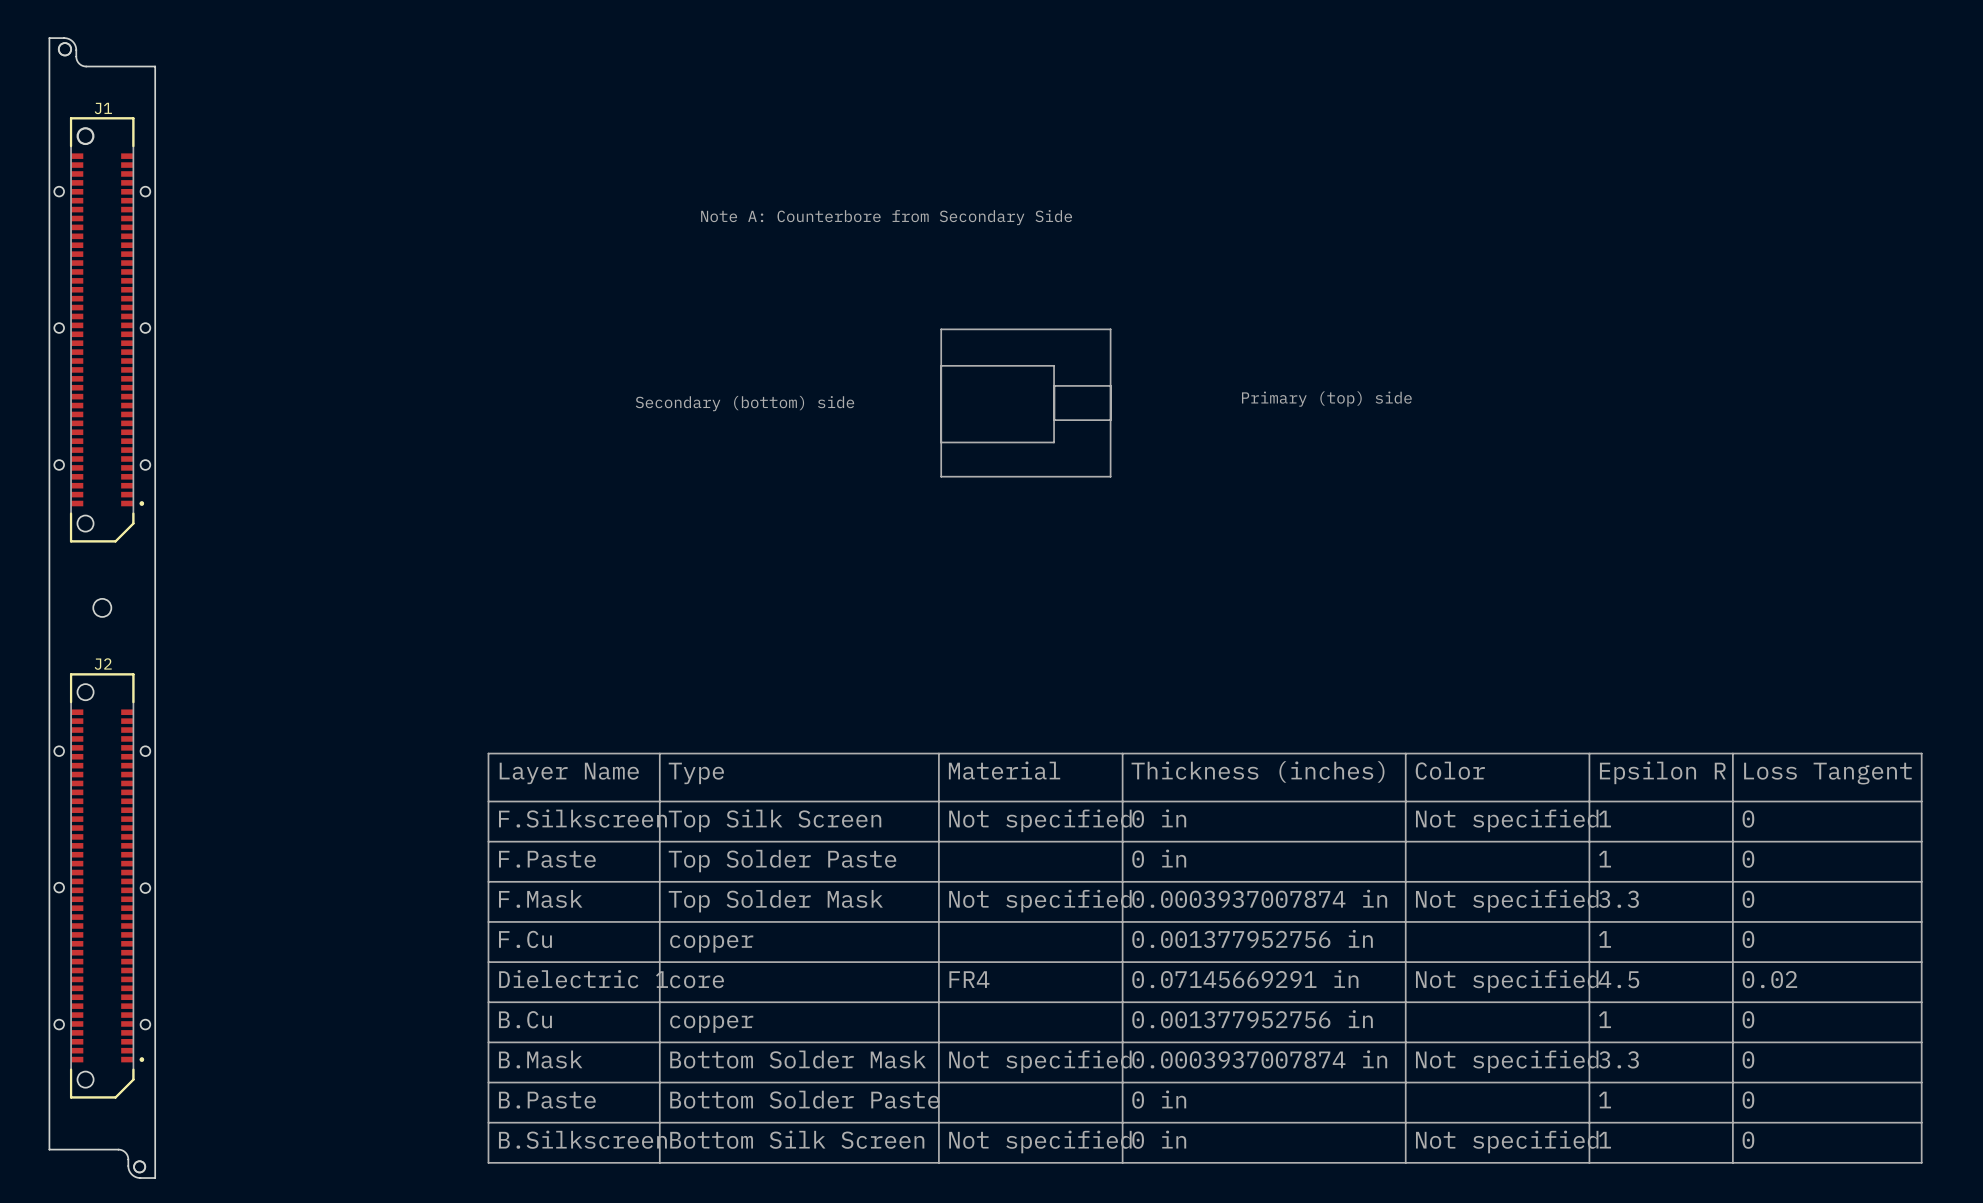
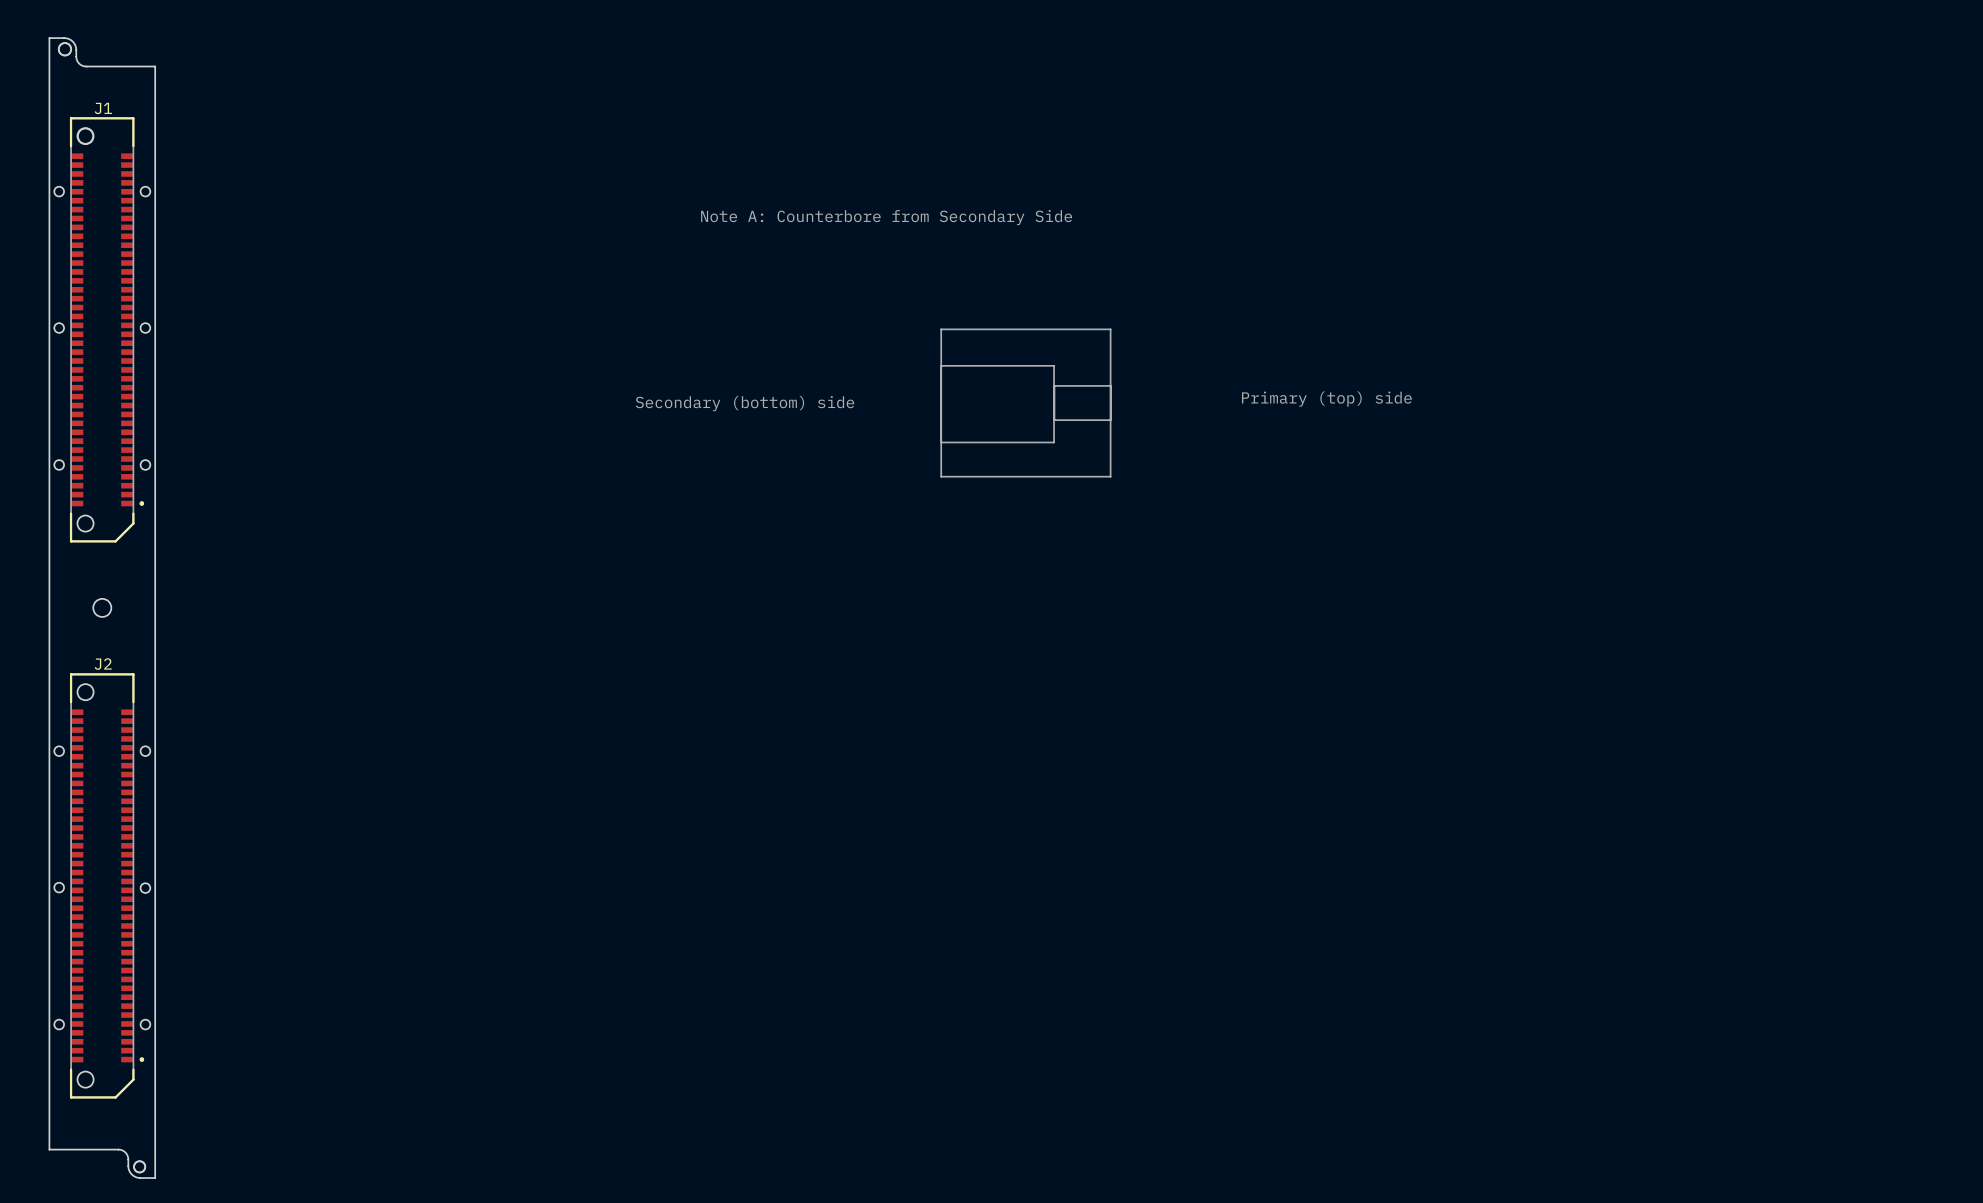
line: (488, 753) (488, 1162) (1921, 1162) (1921, 753) (488, 753) -> none
line: (659, 753) (659, 1162) -> none
line: (938, 753) (938, 1162) -> none
line: (1122, 753) (1122, 1162) -> none
line: (1405, 753) (1405, 1162) -> none
line: (1589, 753) (1589, 1162) -> none
line: (1732, 753) (1732, 1162) -> none
text: Material (1004, 770) -> none
text: Color (1450, 770) -> none
text: Thickness (inches) (1258, 771) -> none
text: Epsilon R (1662, 772) -> none
text: Layer Name (569, 773) -> none
text: Type (696, 773) -> none
text: Loss Tangent (1827, 773) -> none
line: (488, 801) (1921, 801) -> none
text: F.Silkscreen (582, 818) -> none
text: 0 in (1159, 818) -> none
text: 1 (1605, 819) -> none
text: 0 (1748, 819) -> none
text: Top Silk Screen (775, 820) -> none
text: Not specified (1040, 820) -> none
text: Not specified (1507, 820) -> none
line: (488, 841) (1921, 841) -> none
text: 0 in (1159, 858) -> none
text: F.Paste (547, 859) -> none
text: 1 (1605, 859) -> none
text: 0 (1748, 859) -> none
text: Top Solder Paste (782, 861) -> none
line: (488, 881) (1921, 881) -> none
text: F.Mask (540, 898) -> none
text: 0.0003937007874 in (1259, 898) -> none
text: 3.3 (1618, 899) -> none
text: 0 (1748, 899) -> none
text: Top Solder Mask (775, 901) -> none
text: Not specified (1040, 901) -> none
text: Not specified (1507, 901) -> none
line: (488, 921) (1921, 921) -> none
text: 0.001377952756 in (1252, 938) -> none
text: F.Cu (525, 939) -> none
text: 1 (1605, 939) -> none
text: 0 (1748, 939) -> none
text: copper (711, 943) -> none
line: (488, 962) (1921, 962) -> none
text: Dielectric 1 (583, 979) -> none
text: FR4 (969, 979) -> none
text: 0.07145669291 in (1245, 979) -> none
text: 4.5 (1618, 979) -> none
text: 0.02 (1769, 979) -> none
text: core (697, 981) -> none
text: Not specified (1507, 981) -> none
line: (488, 1002) (1921, 1002) -> none
text: B.Cu (525, 1019) -> none
text: 0.001377952756 in (1252, 1019) -> none
text: 1 (1605, 1019) -> none
text: 0 (1748, 1019) -> none
text: copper (711, 1024) -> none
line: (488, 1042) (1921, 1042) -> none
text: B.Mask (540, 1059) -> none
text: Bottom Solder Mask (798, 1059) -> none
text: 0.0003937007874 in (1259, 1059) -> none
text: 3.3 (1618, 1059) -> none
text: 0 (1748, 1059) -> none
text: Not specified (1040, 1061) -> none
text: Not specified (1507, 1061) -> none
line: (488, 1082) (1921, 1082) -> none
text: Bottom Solder Paste (804, 1099) -> none
text: 0 in (1159, 1099) -> none
text: B.Paste (547, 1100) -> none
text: 1 (1605, 1100) -> none
text: 0 (1748, 1100) -> none
line: (488, 1122) (1921, 1122) -> none
text: B.Silkscreen (582, 1139) -> none
text: Bottom Silk Screen (797, 1139) -> none
text: 0 in (1159, 1139) -> none
text: 1 (1605, 1140) -> none
text: 0 (1748, 1140) -> none
text: Not specified (1040, 1141) -> none
text: Not specified (1507, 1141) -> none

